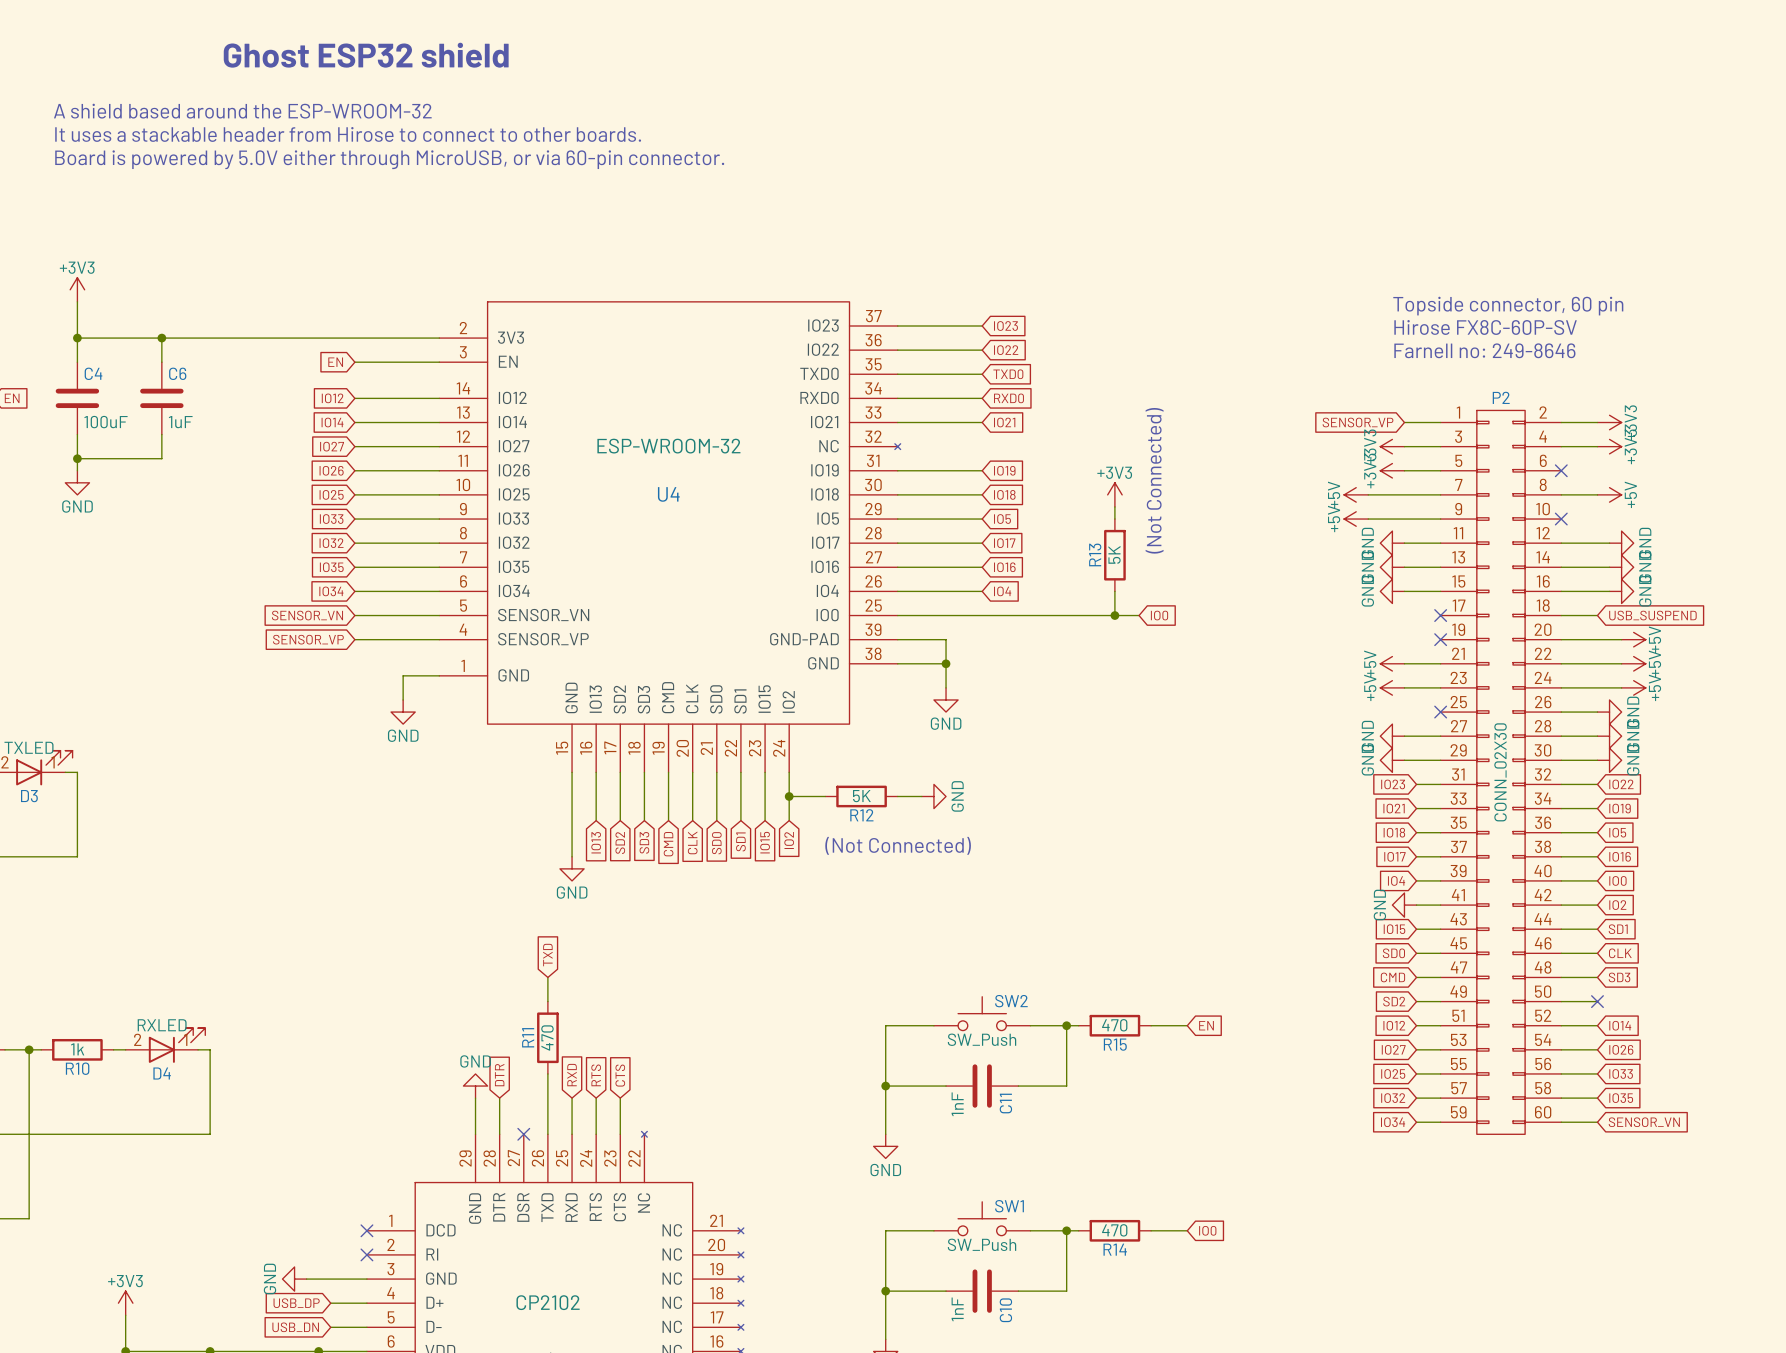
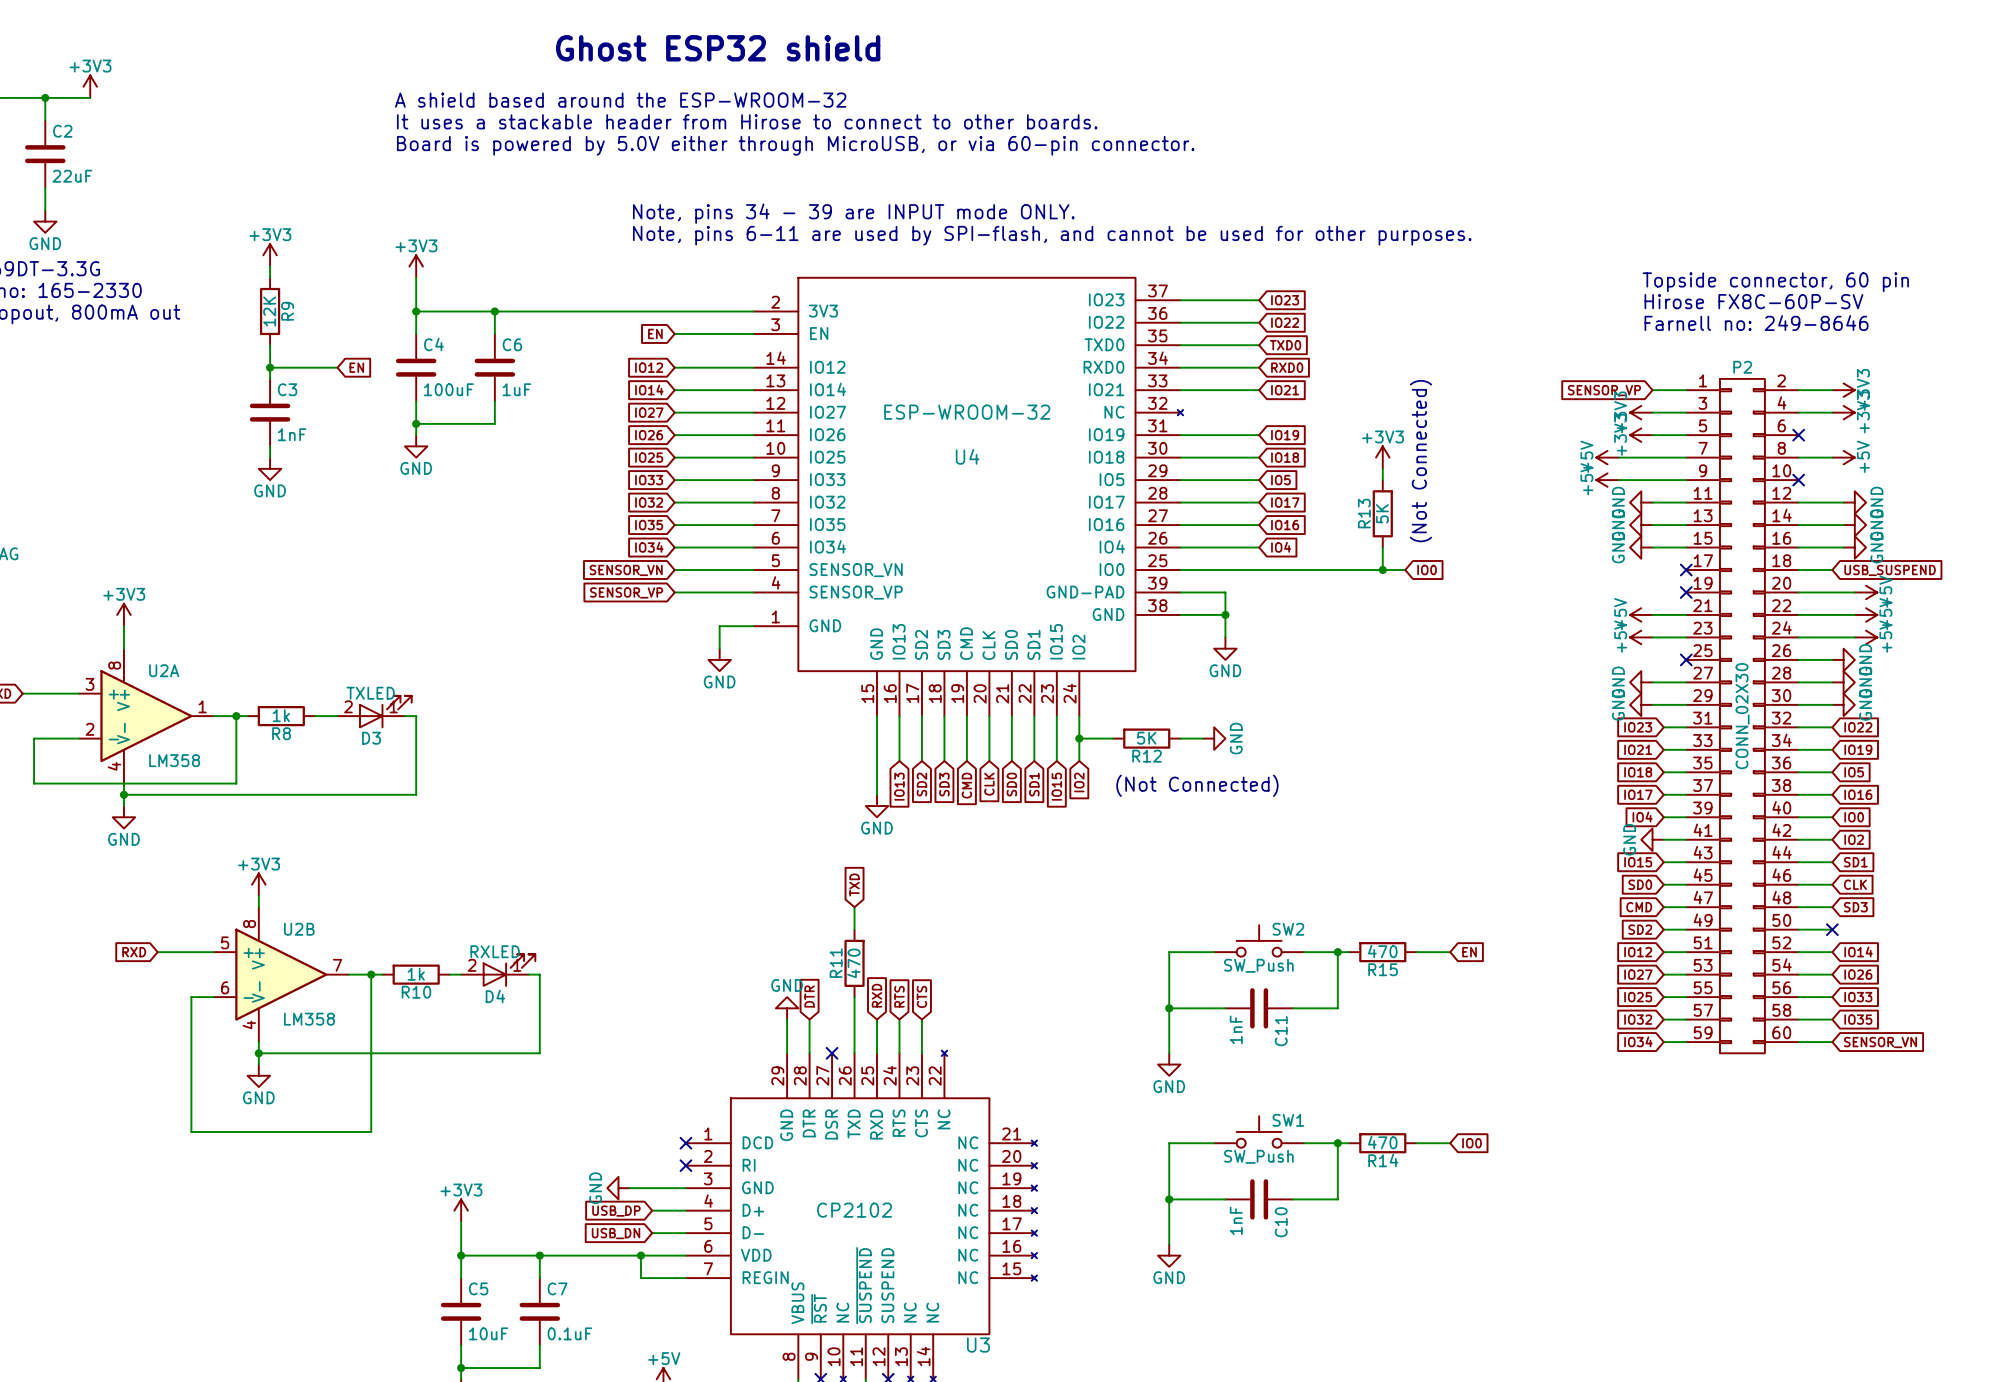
text: none -> Note, pins 34 - 39 are INPUT mode ONLY. (853, 213)
text: none -> Note, pins 6-11 are used by SPI-flash, and cannot be used for other purposes. (1052, 235)

